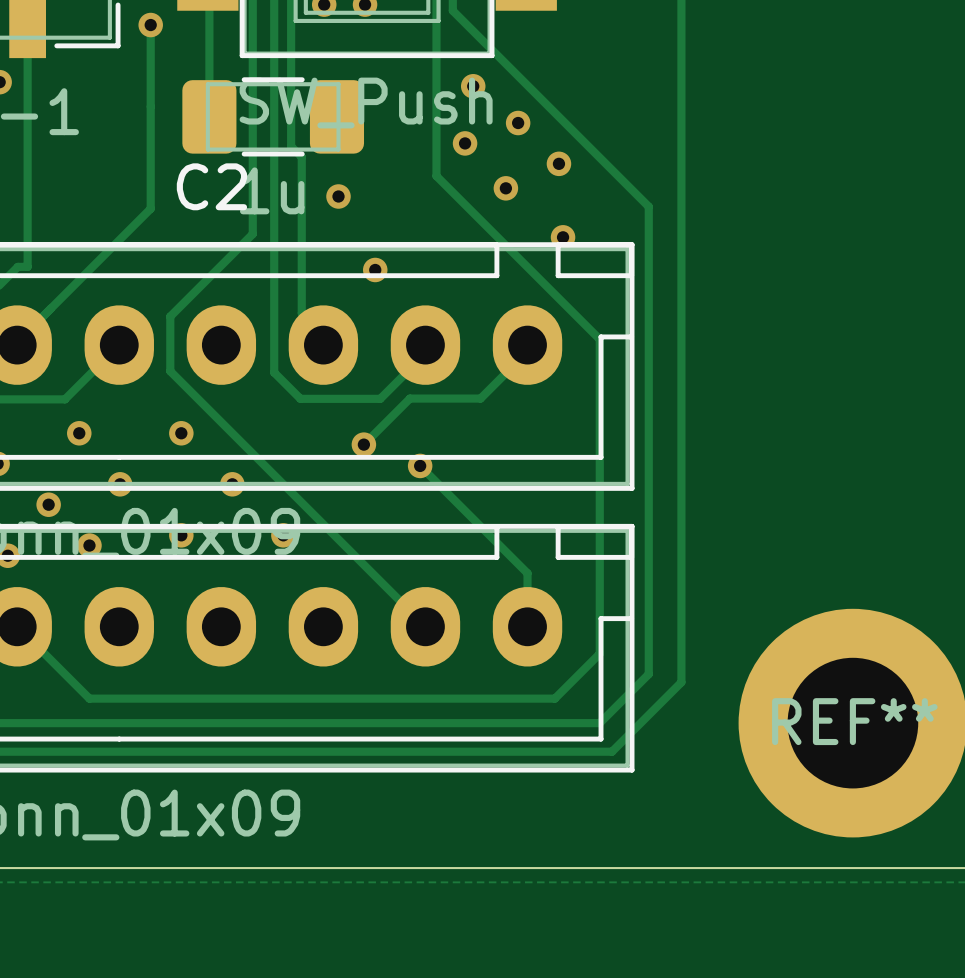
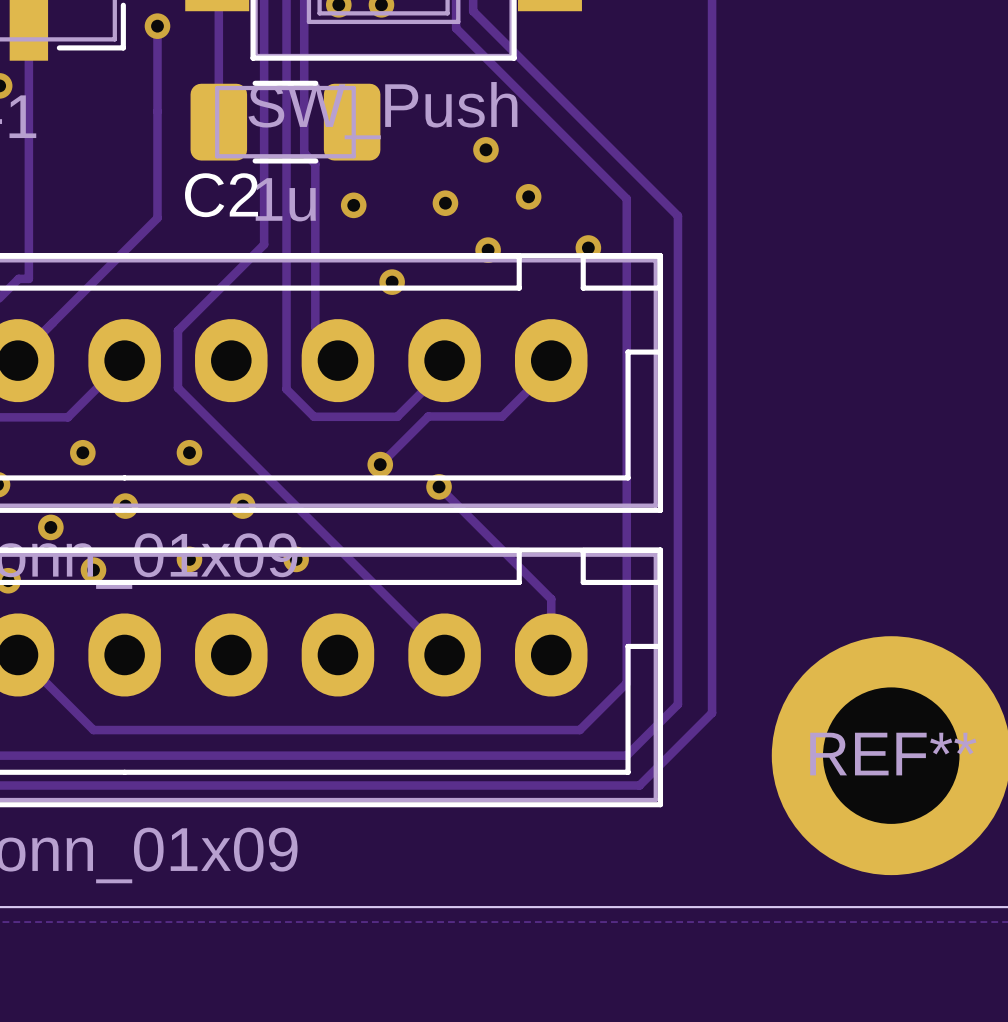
track: (436, 27) (436, 176) (599, 339) -> (456, 28) (626, 198) (626, 354)
via: (473, 86) -> none
via: (518, 123) -> none
via: (558, 163) -> none
via: none -> (445, 203)
via: none -> (488, 250)

